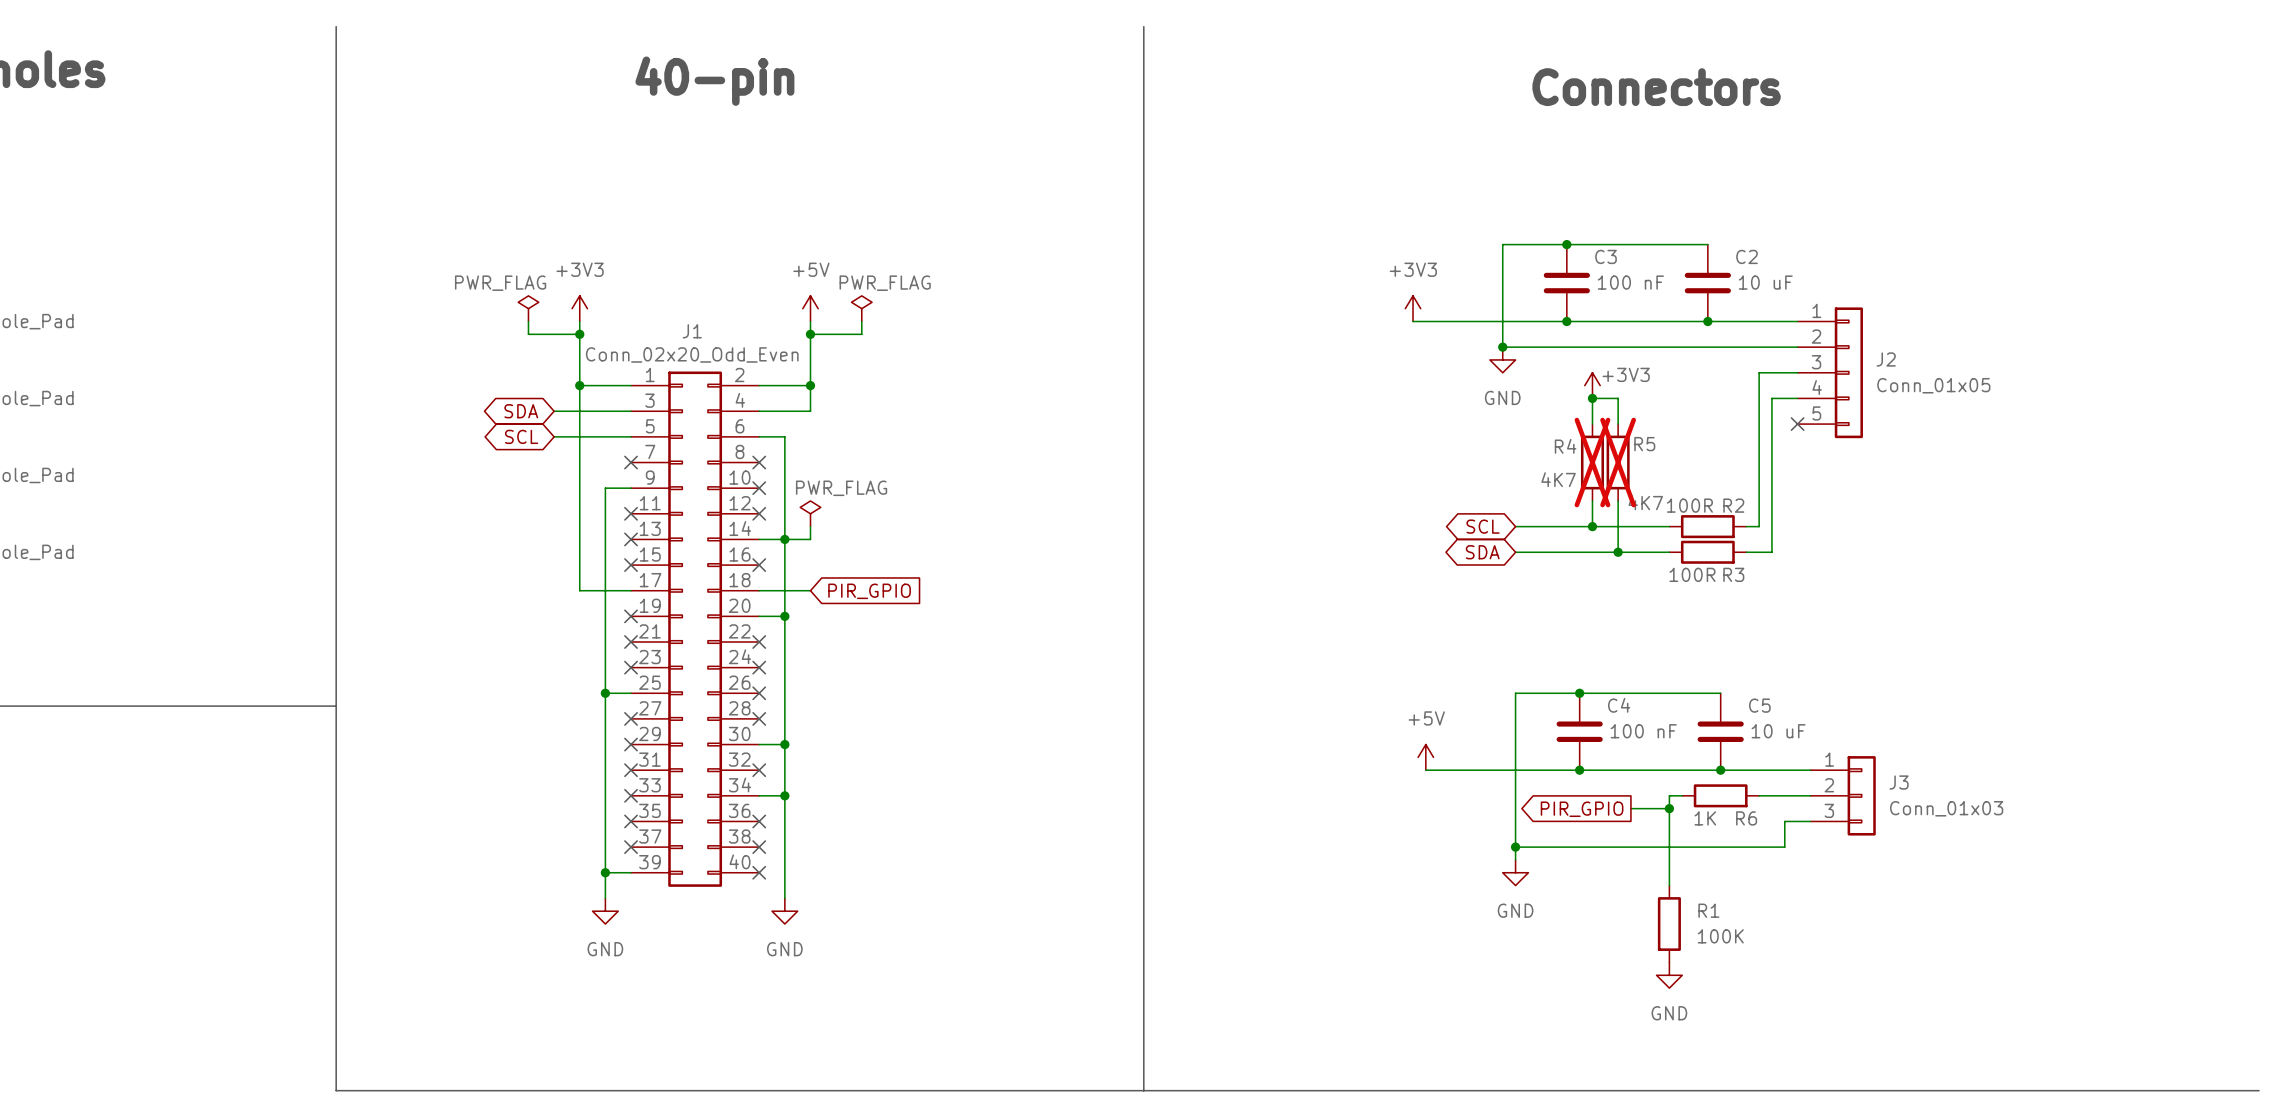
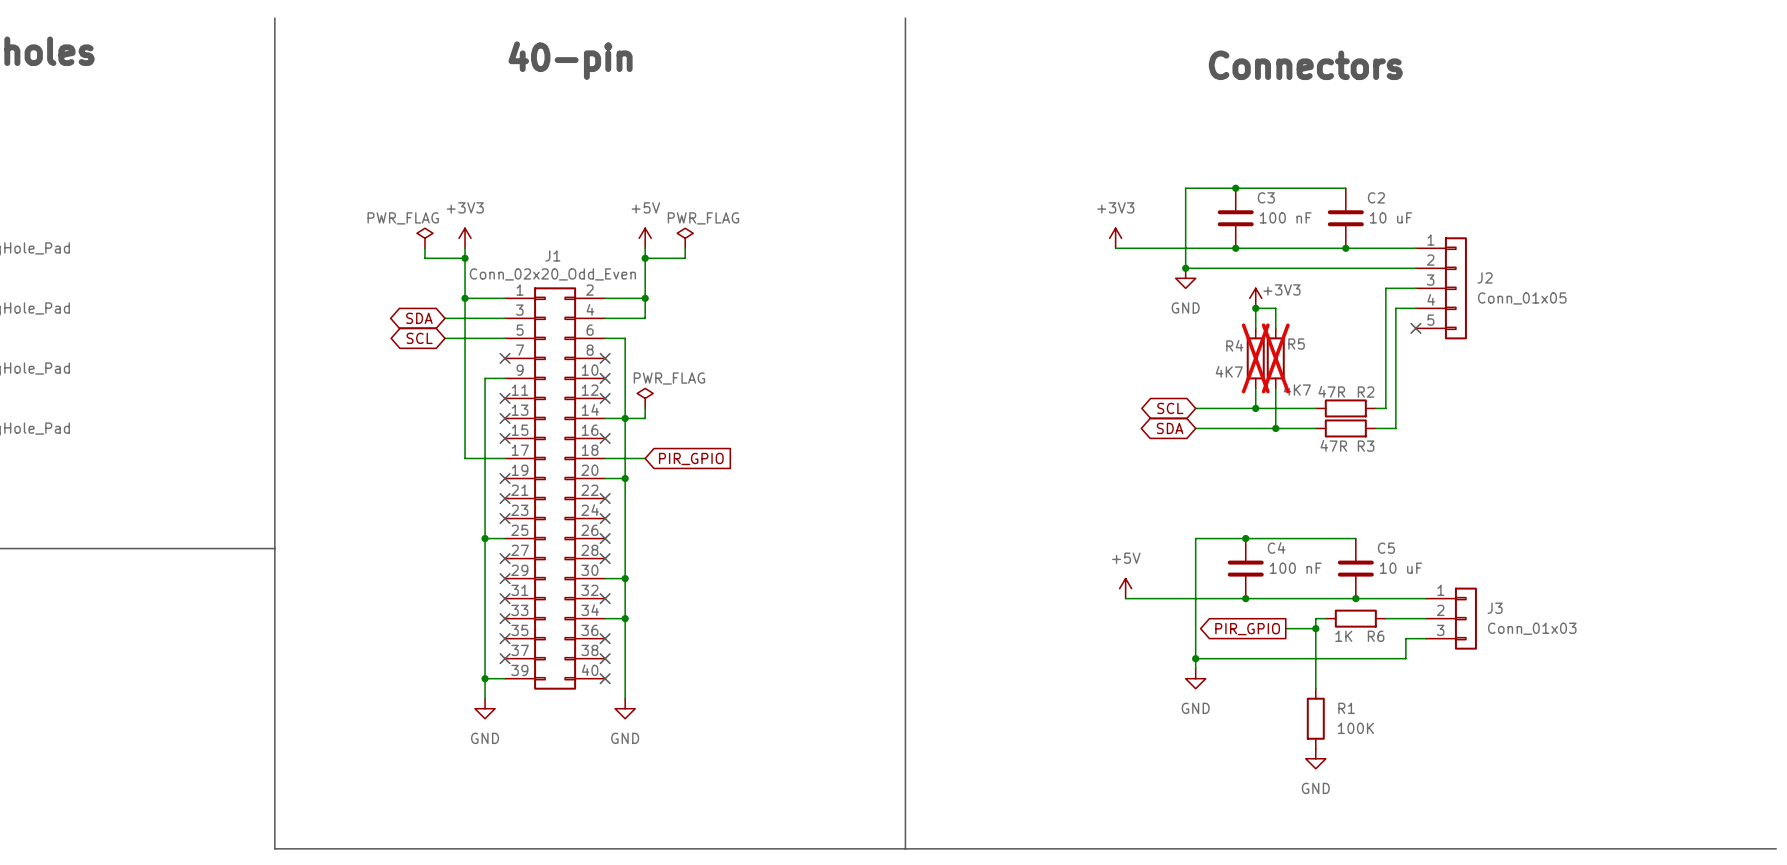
R2 value: 100R (1689, 505) -> 47R (1331, 391)
R3 value: 100R (1692, 574) -> 47R (1333, 445)

